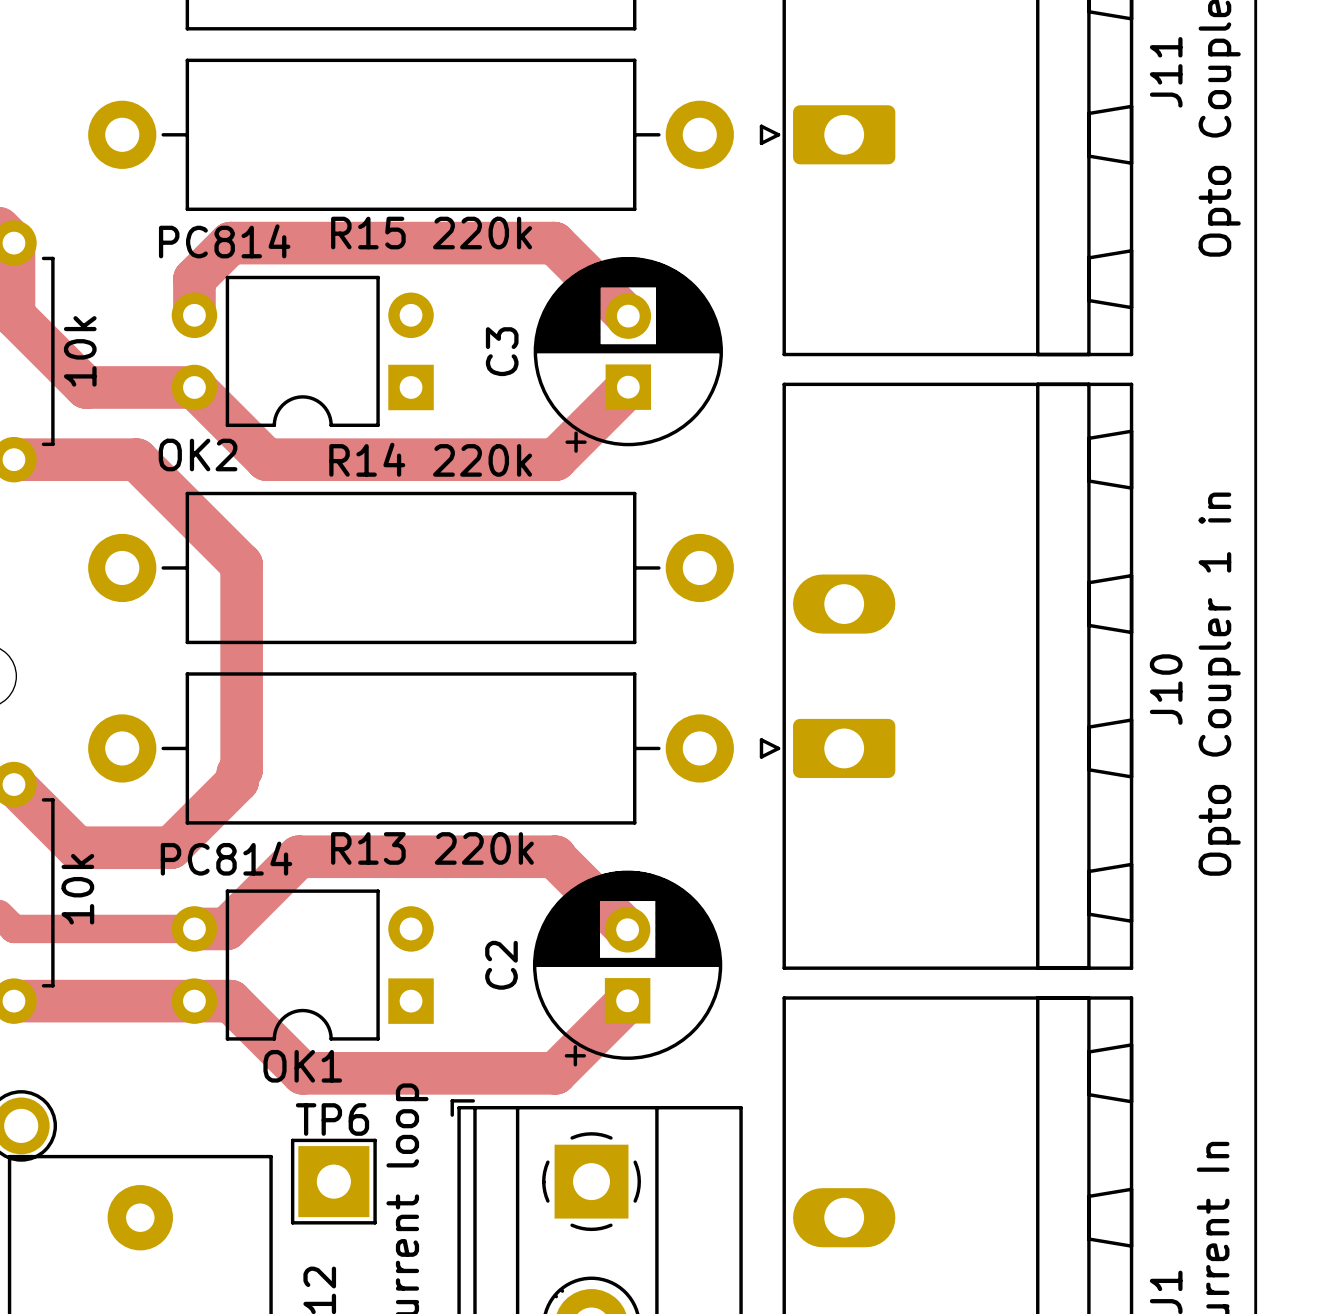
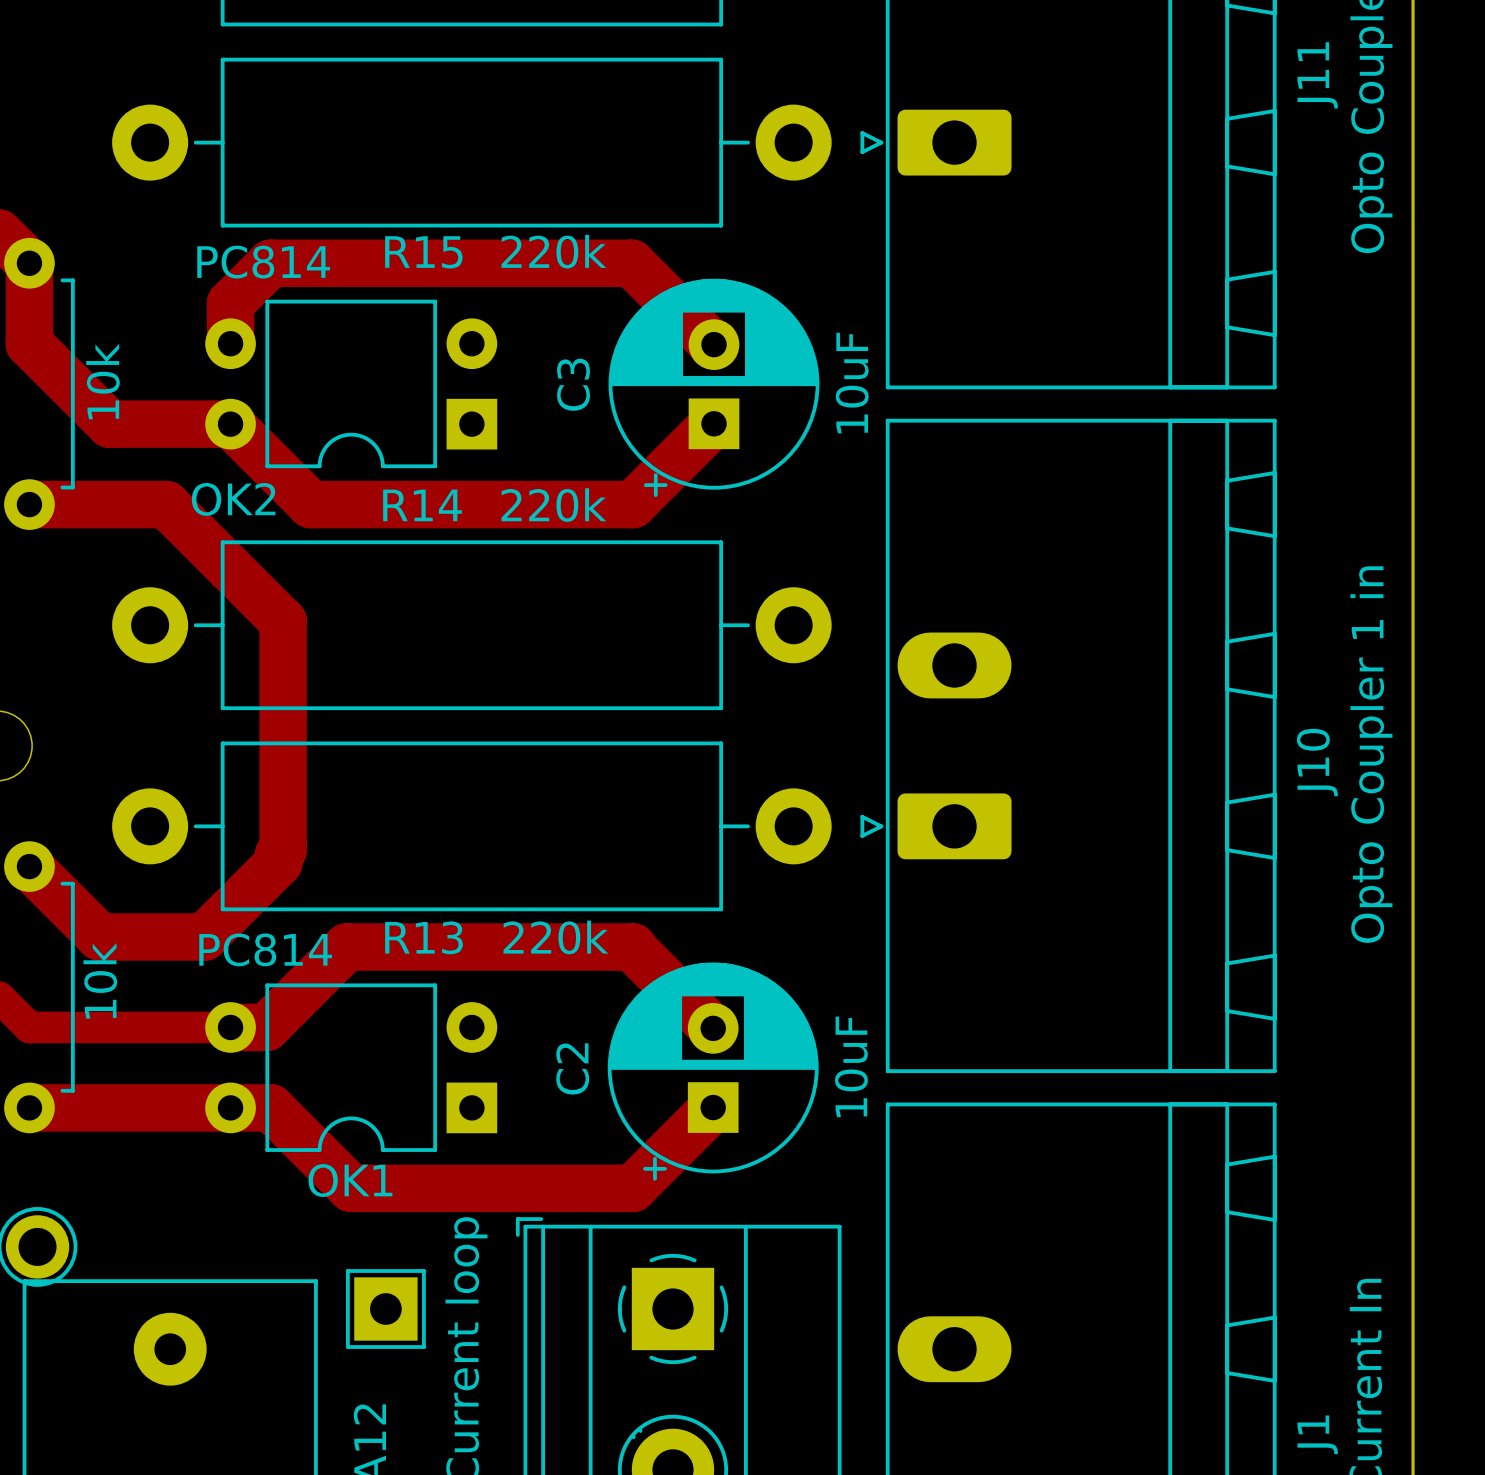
C3 value: none -> 10uF (852, 383)
C2 value: none -> 10uF (851, 1066)
TP6: (333, 1181) -> none
part: none -> (385, 1309)

